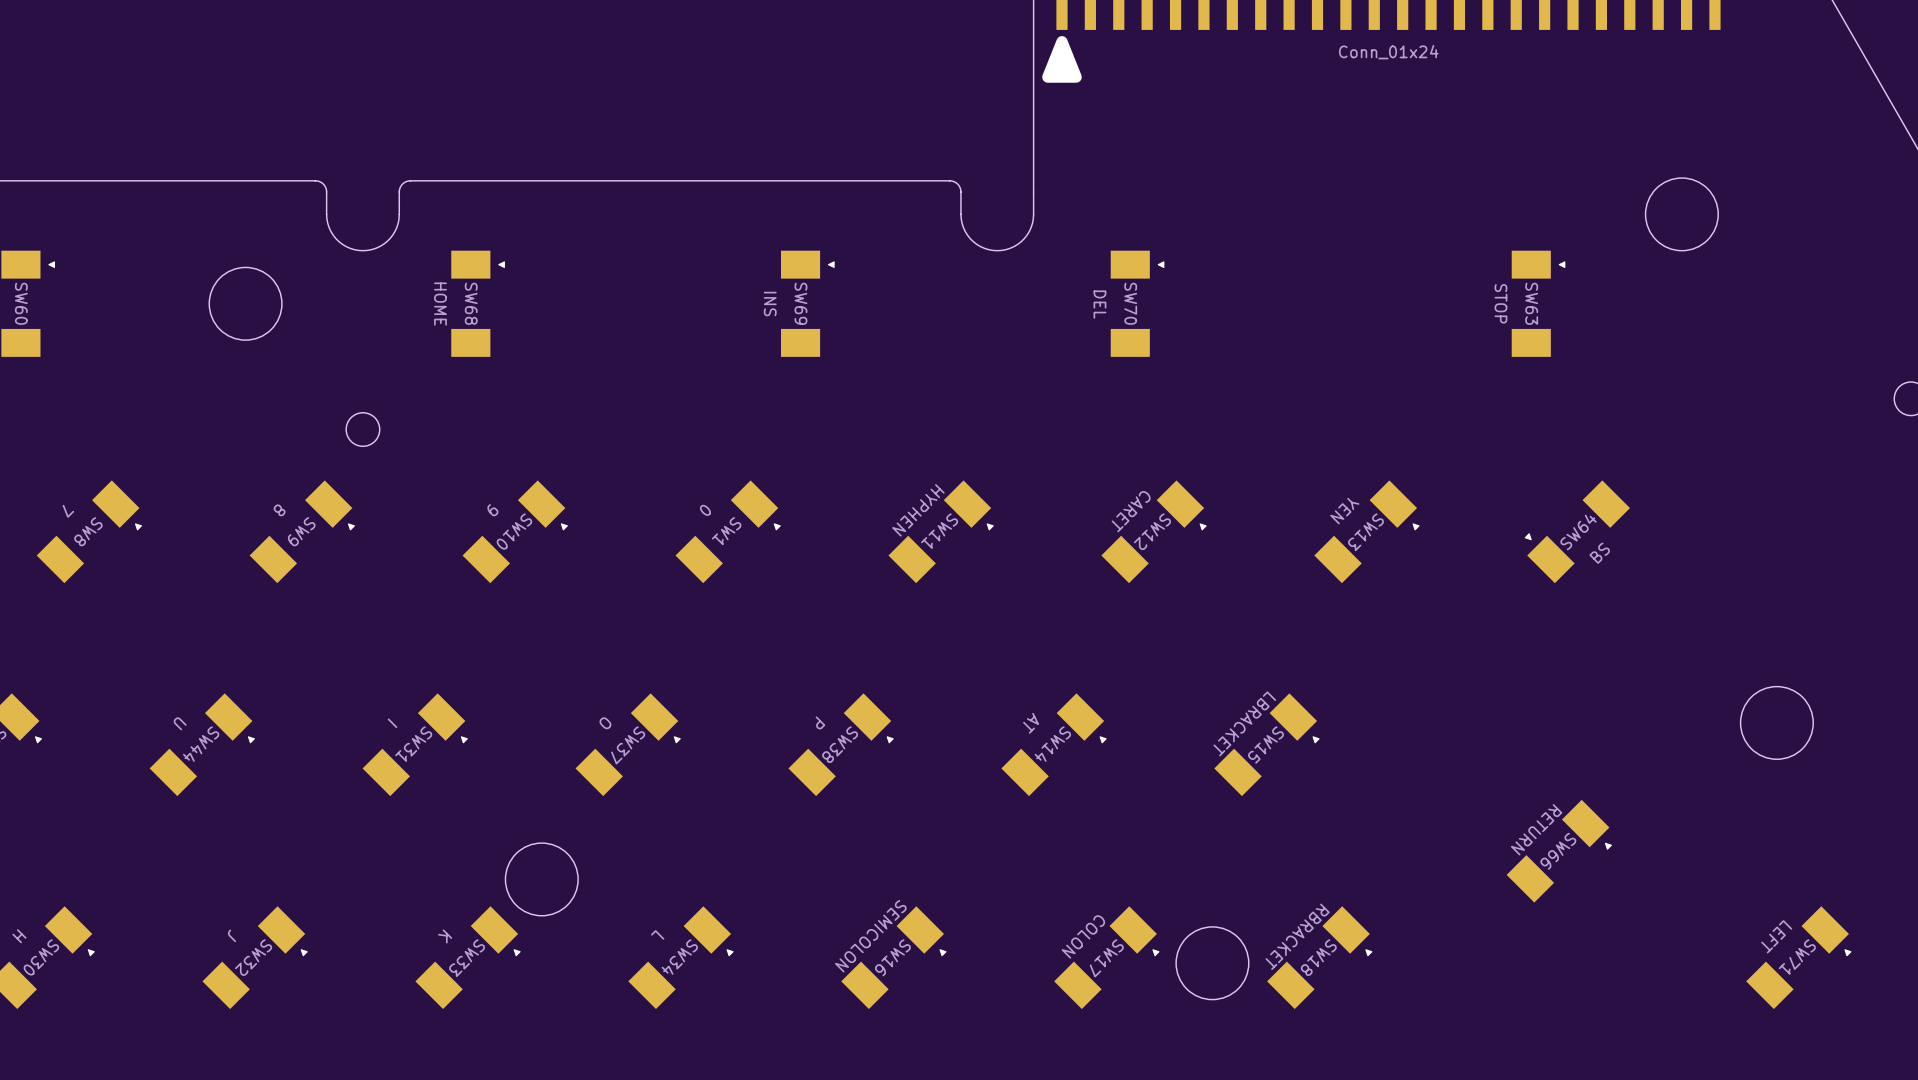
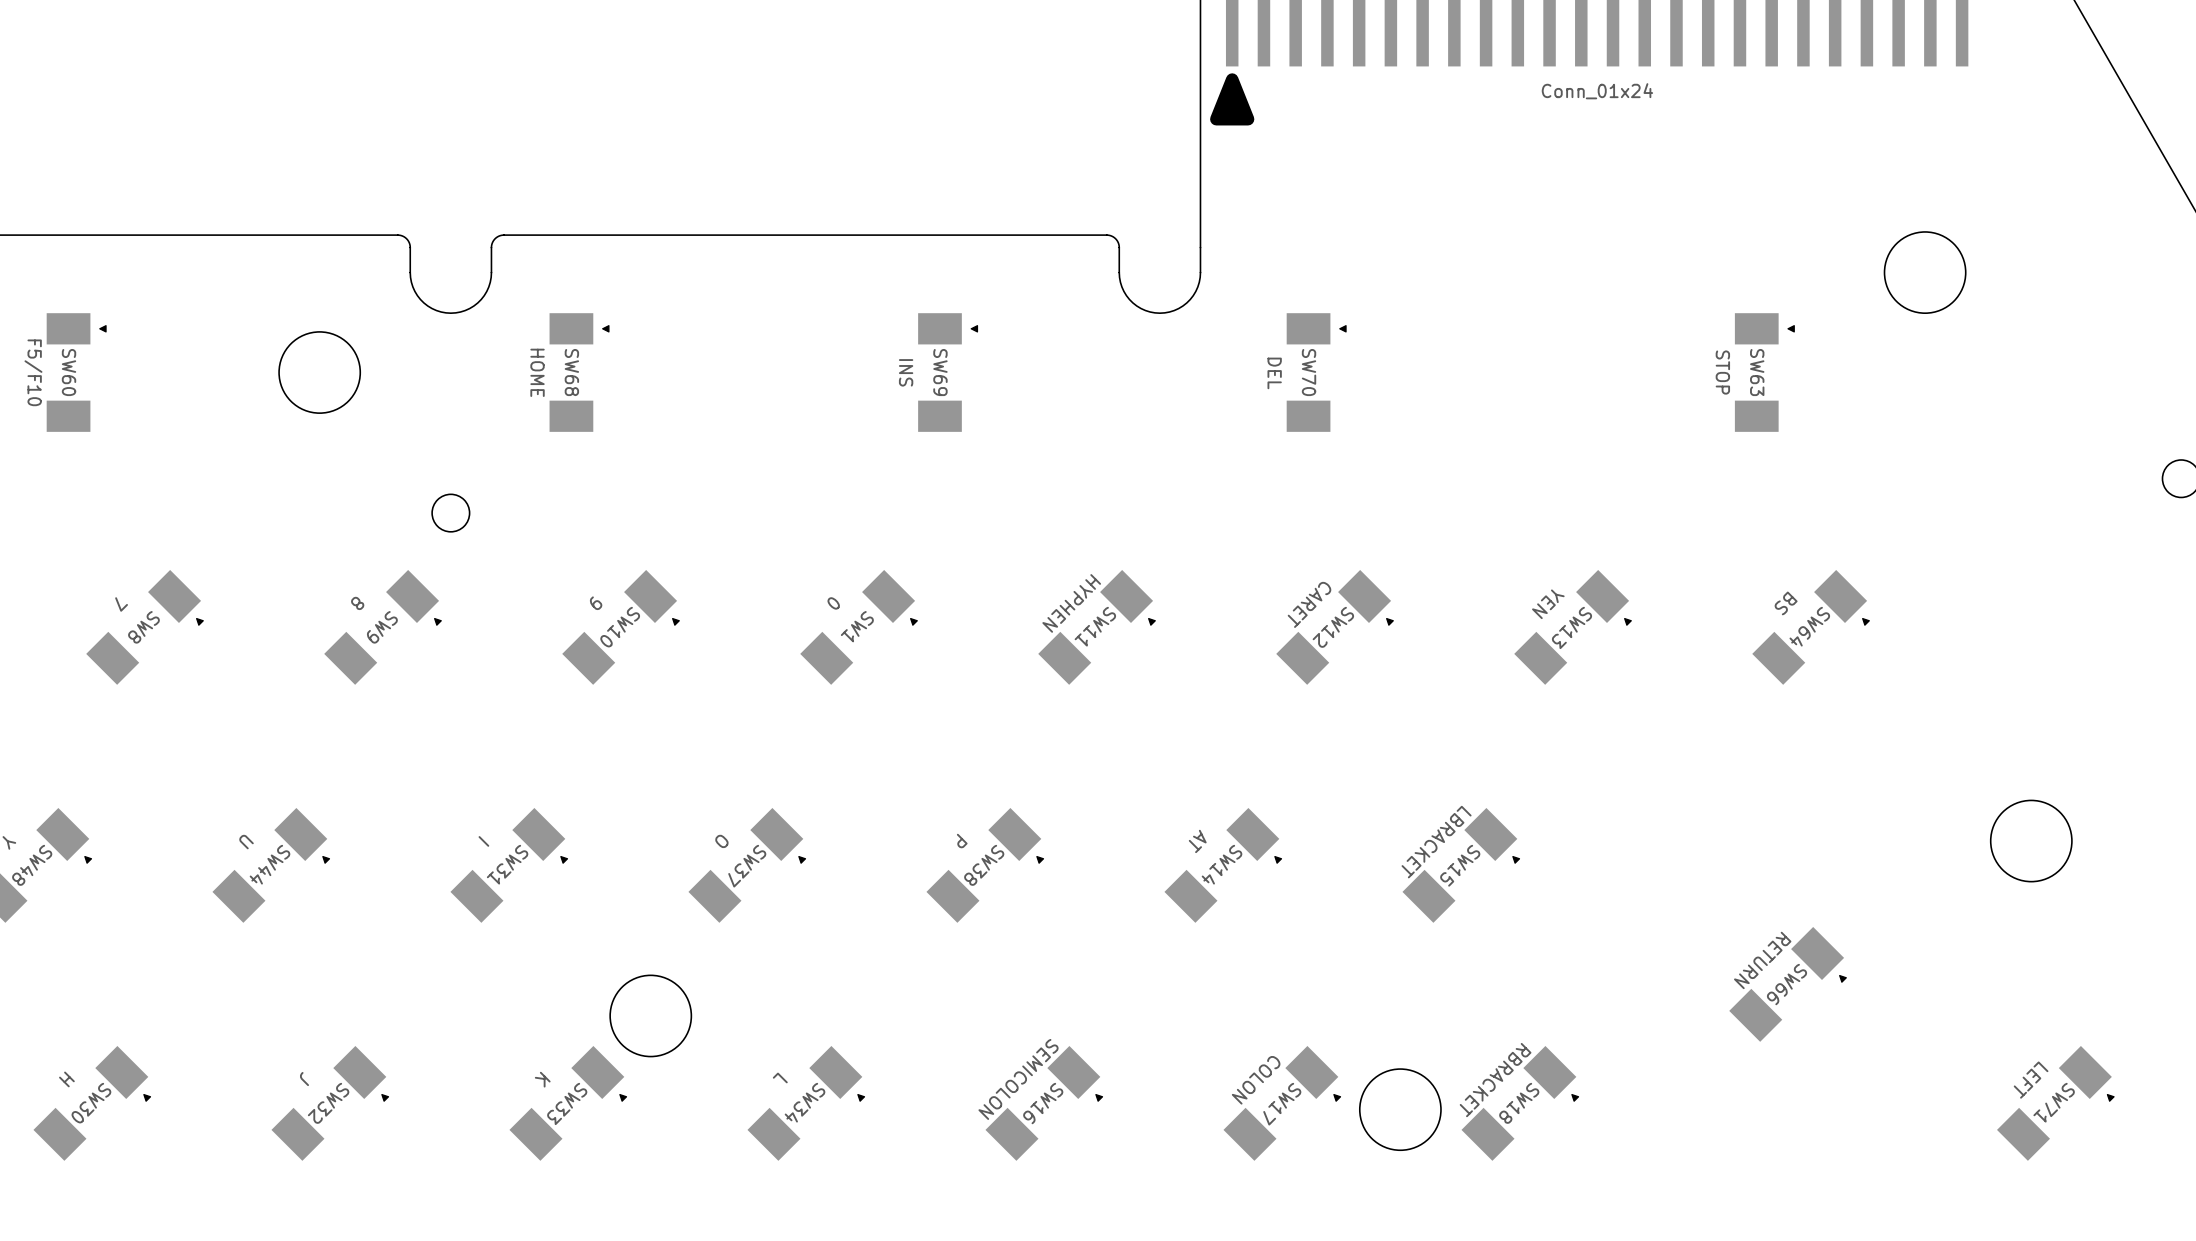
SW64 rotation: 0° (1577, 531) -> 180° (1811, 627)

